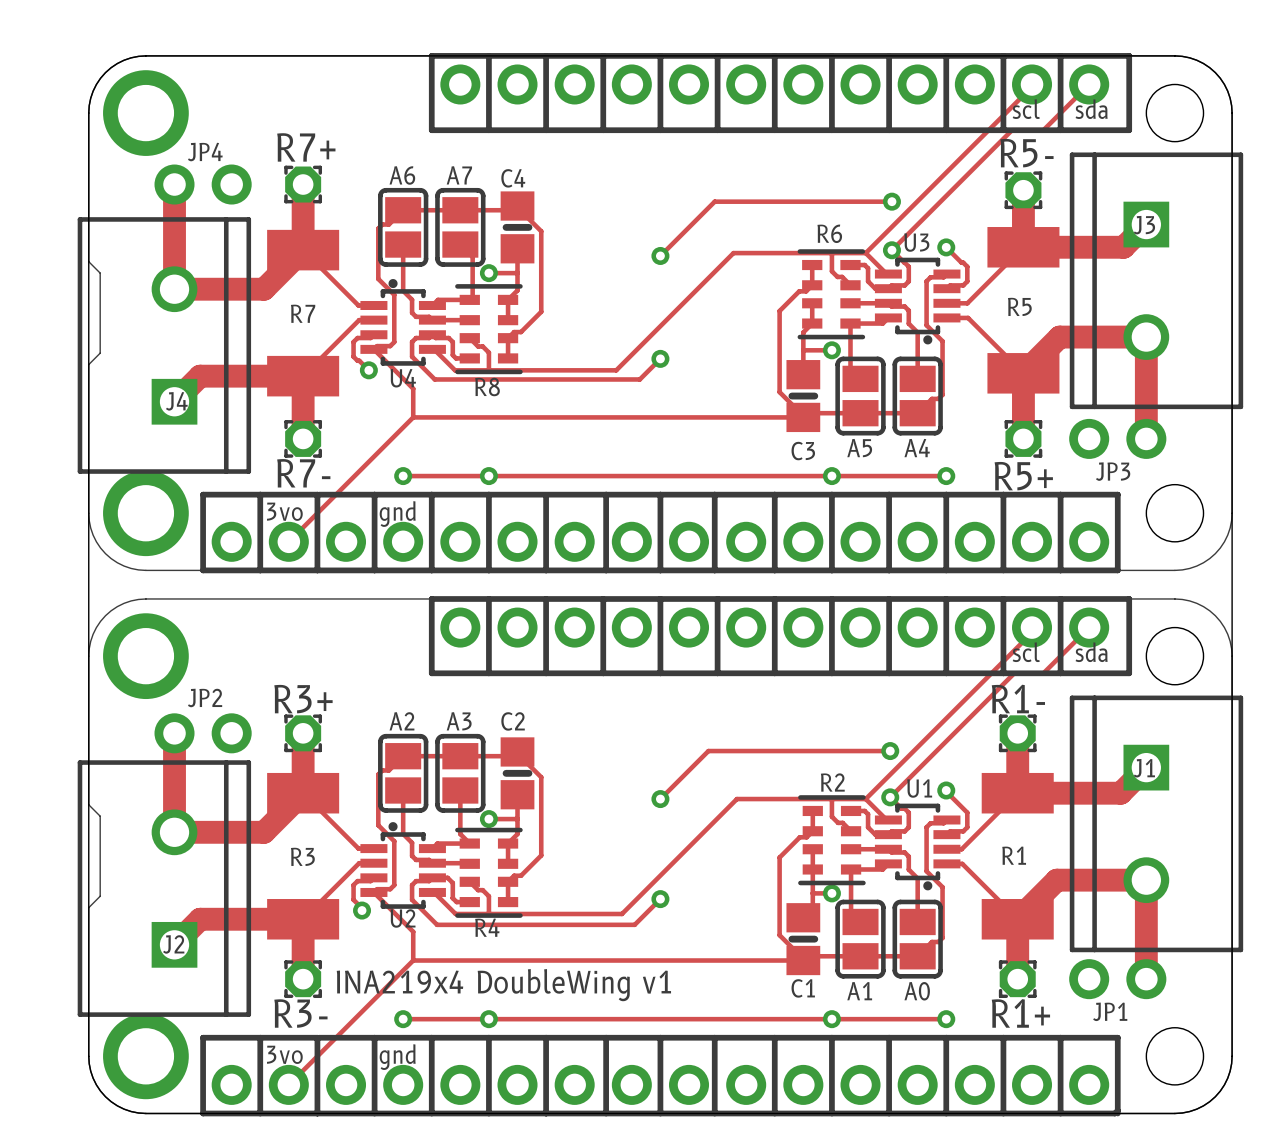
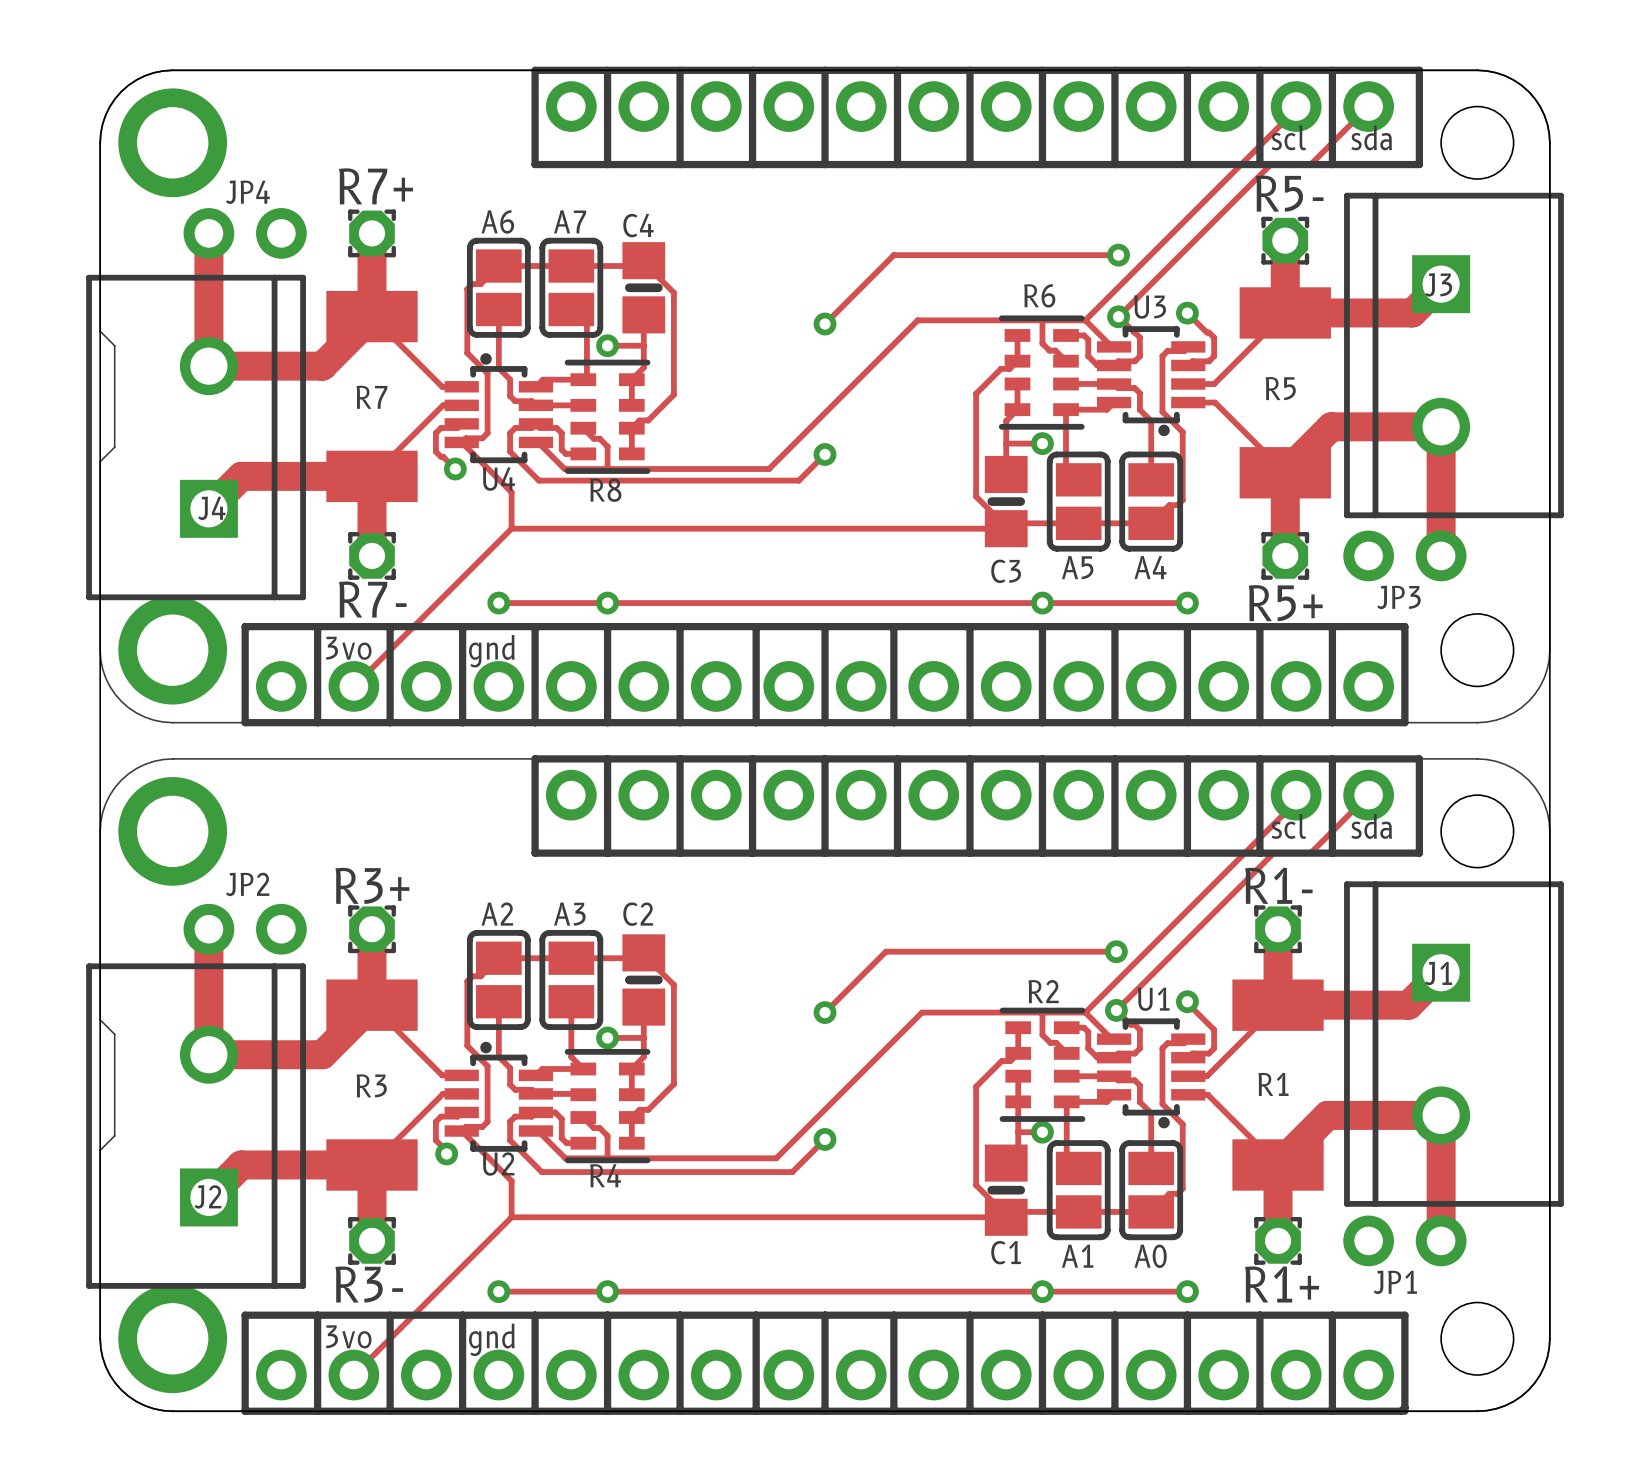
text: INA219x4 DoubleWing v1 (503, 985) -> none

